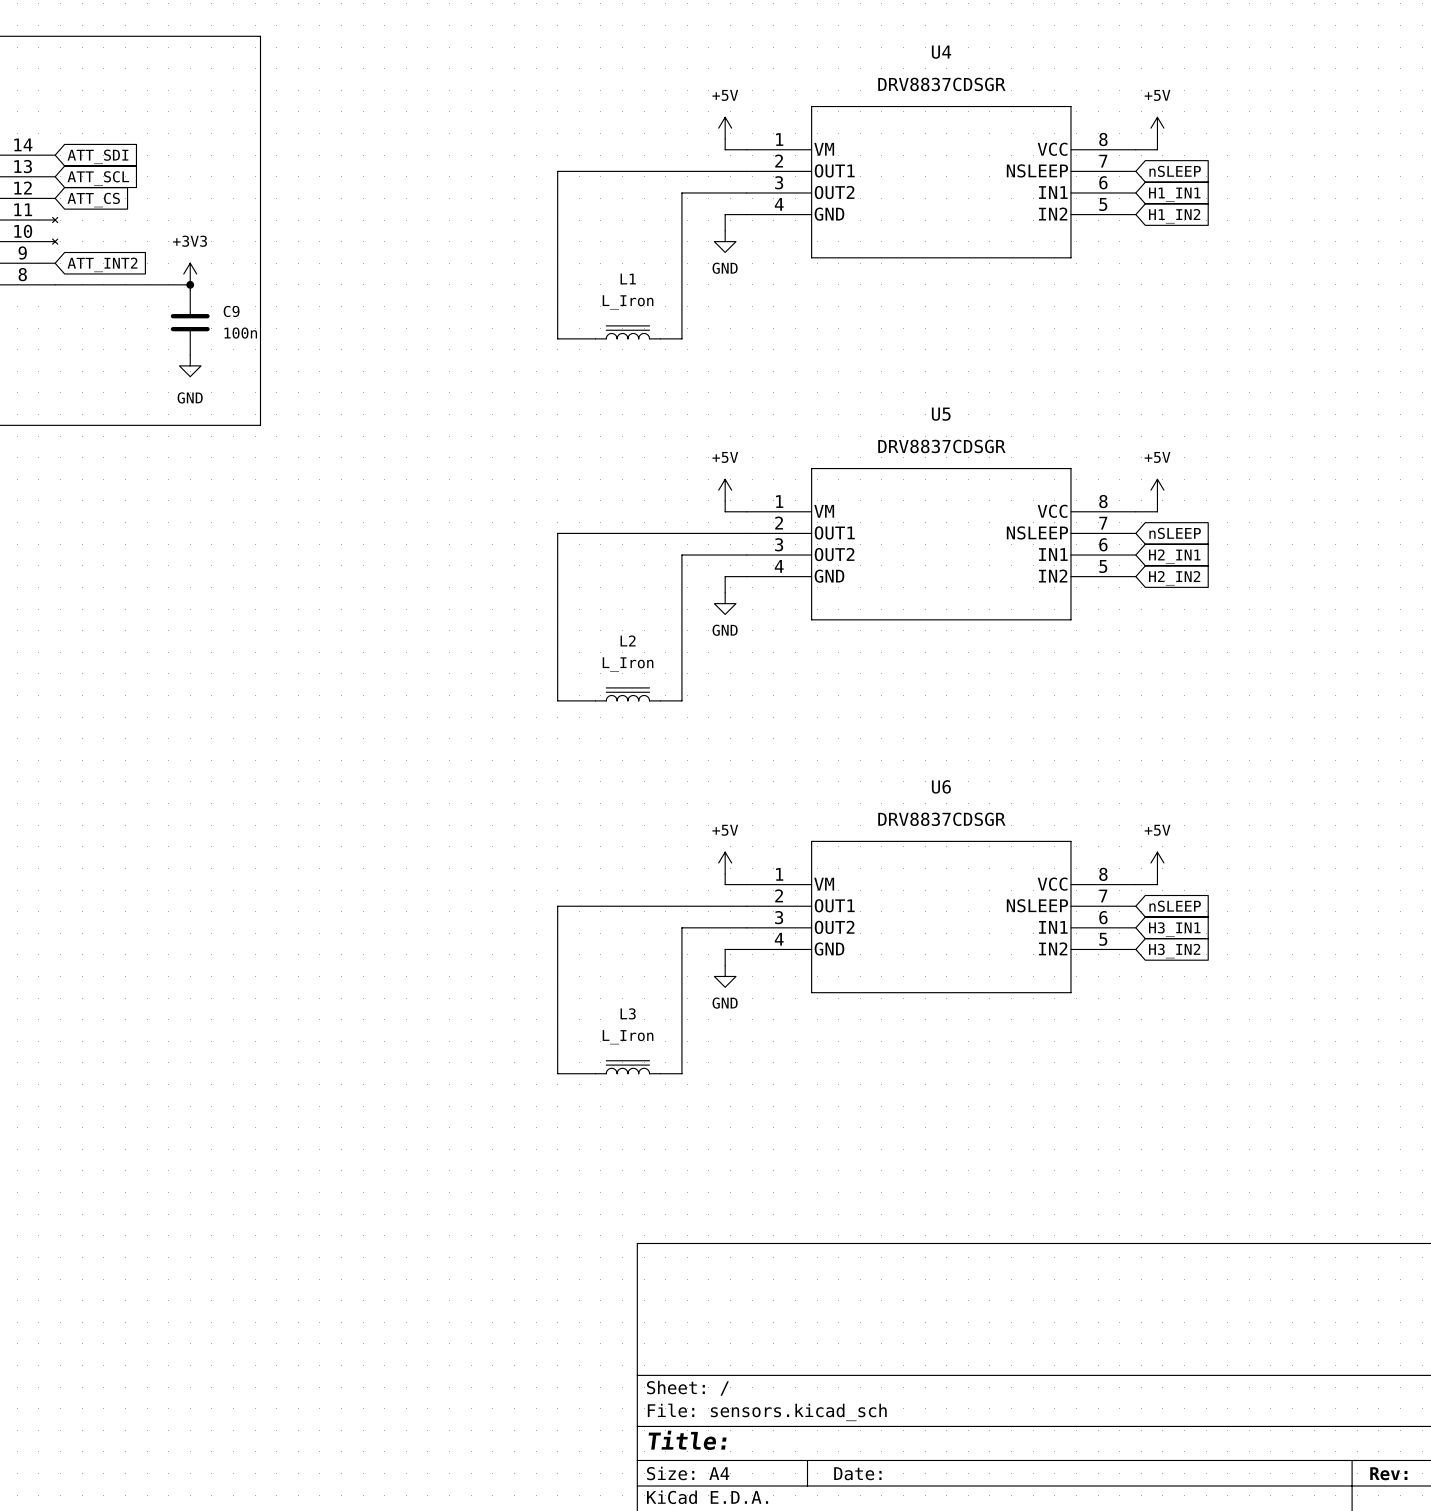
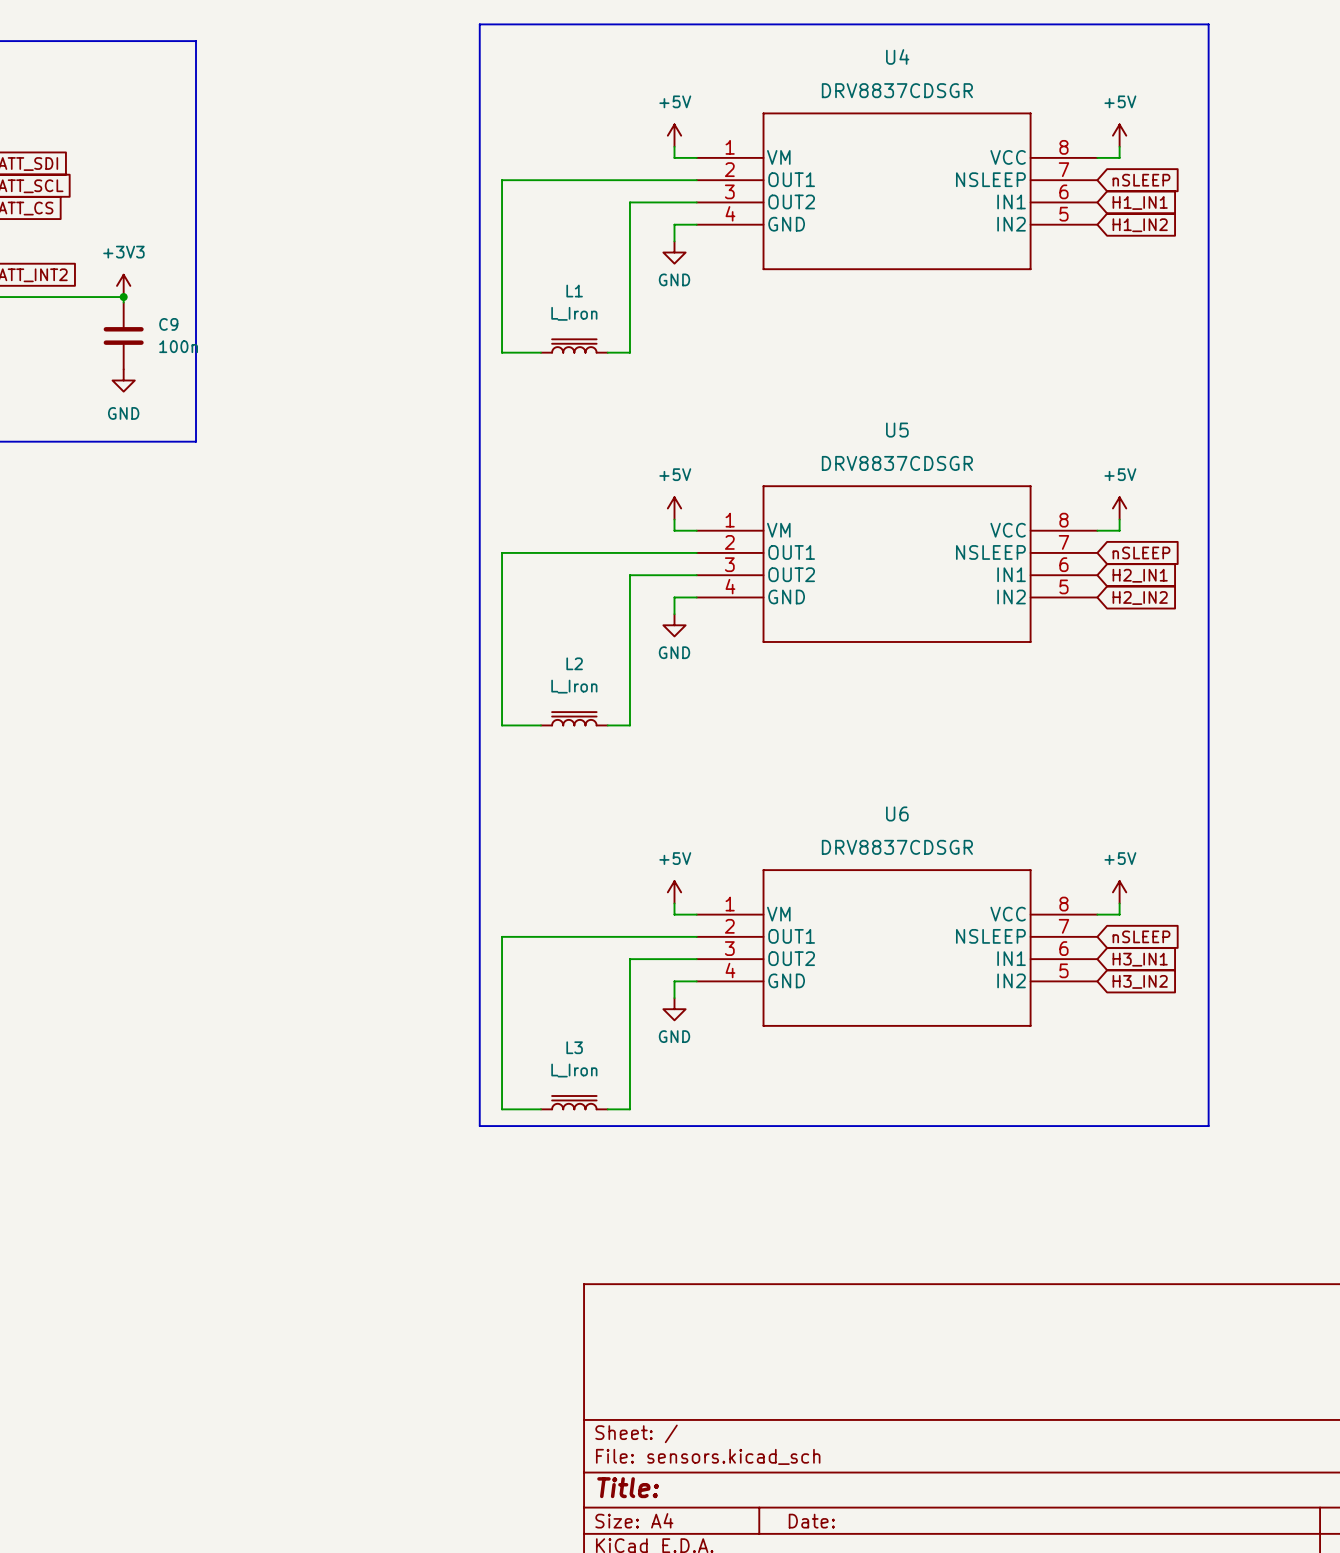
line: none -> (479, 24) (479, 1126) (1208, 1126) (1208, 24) (479, 24)

